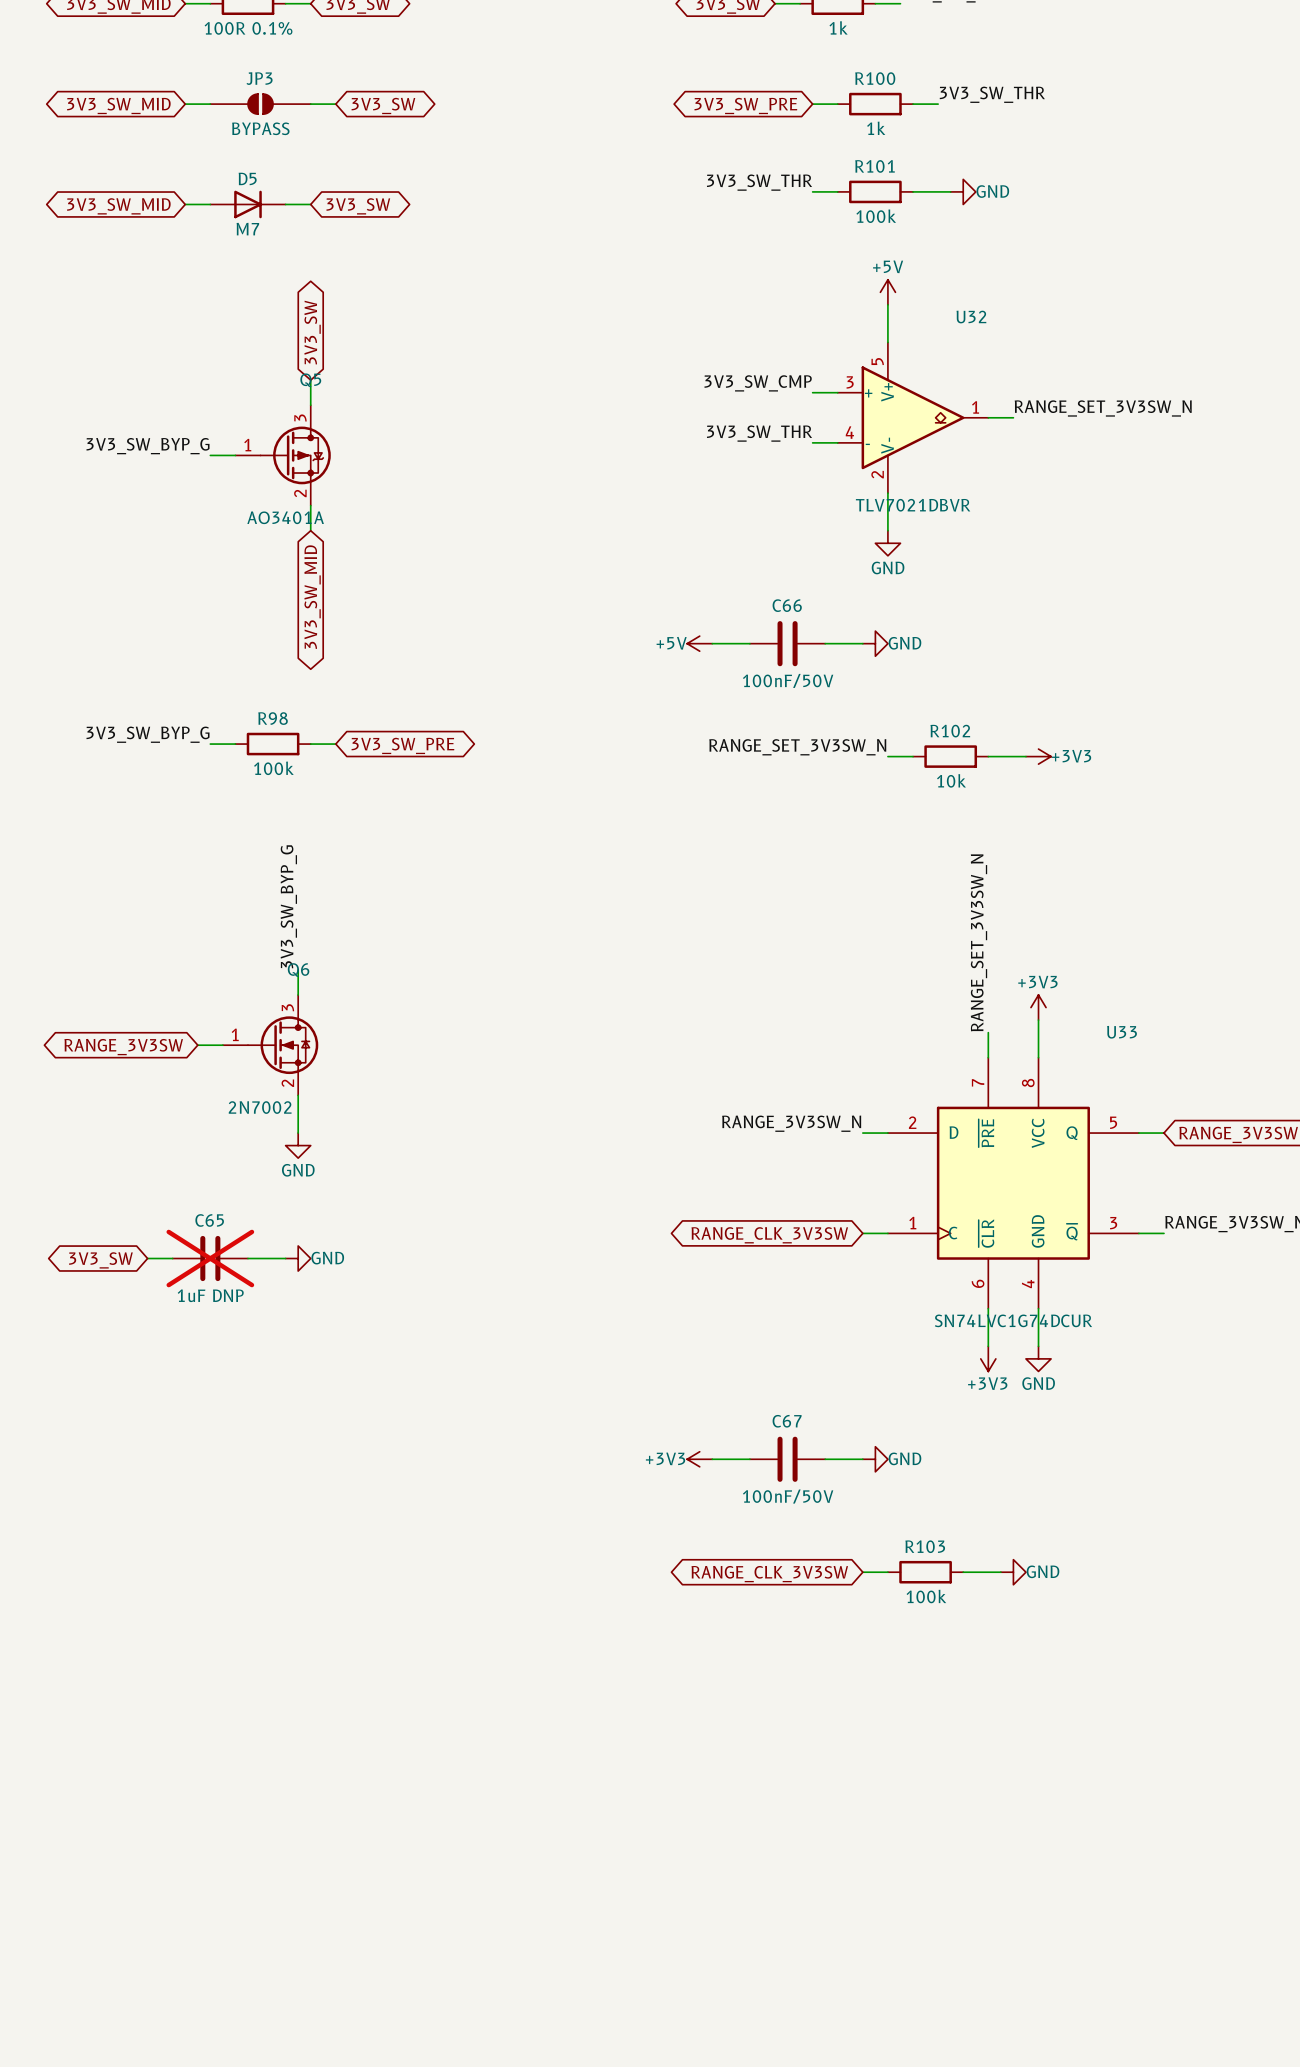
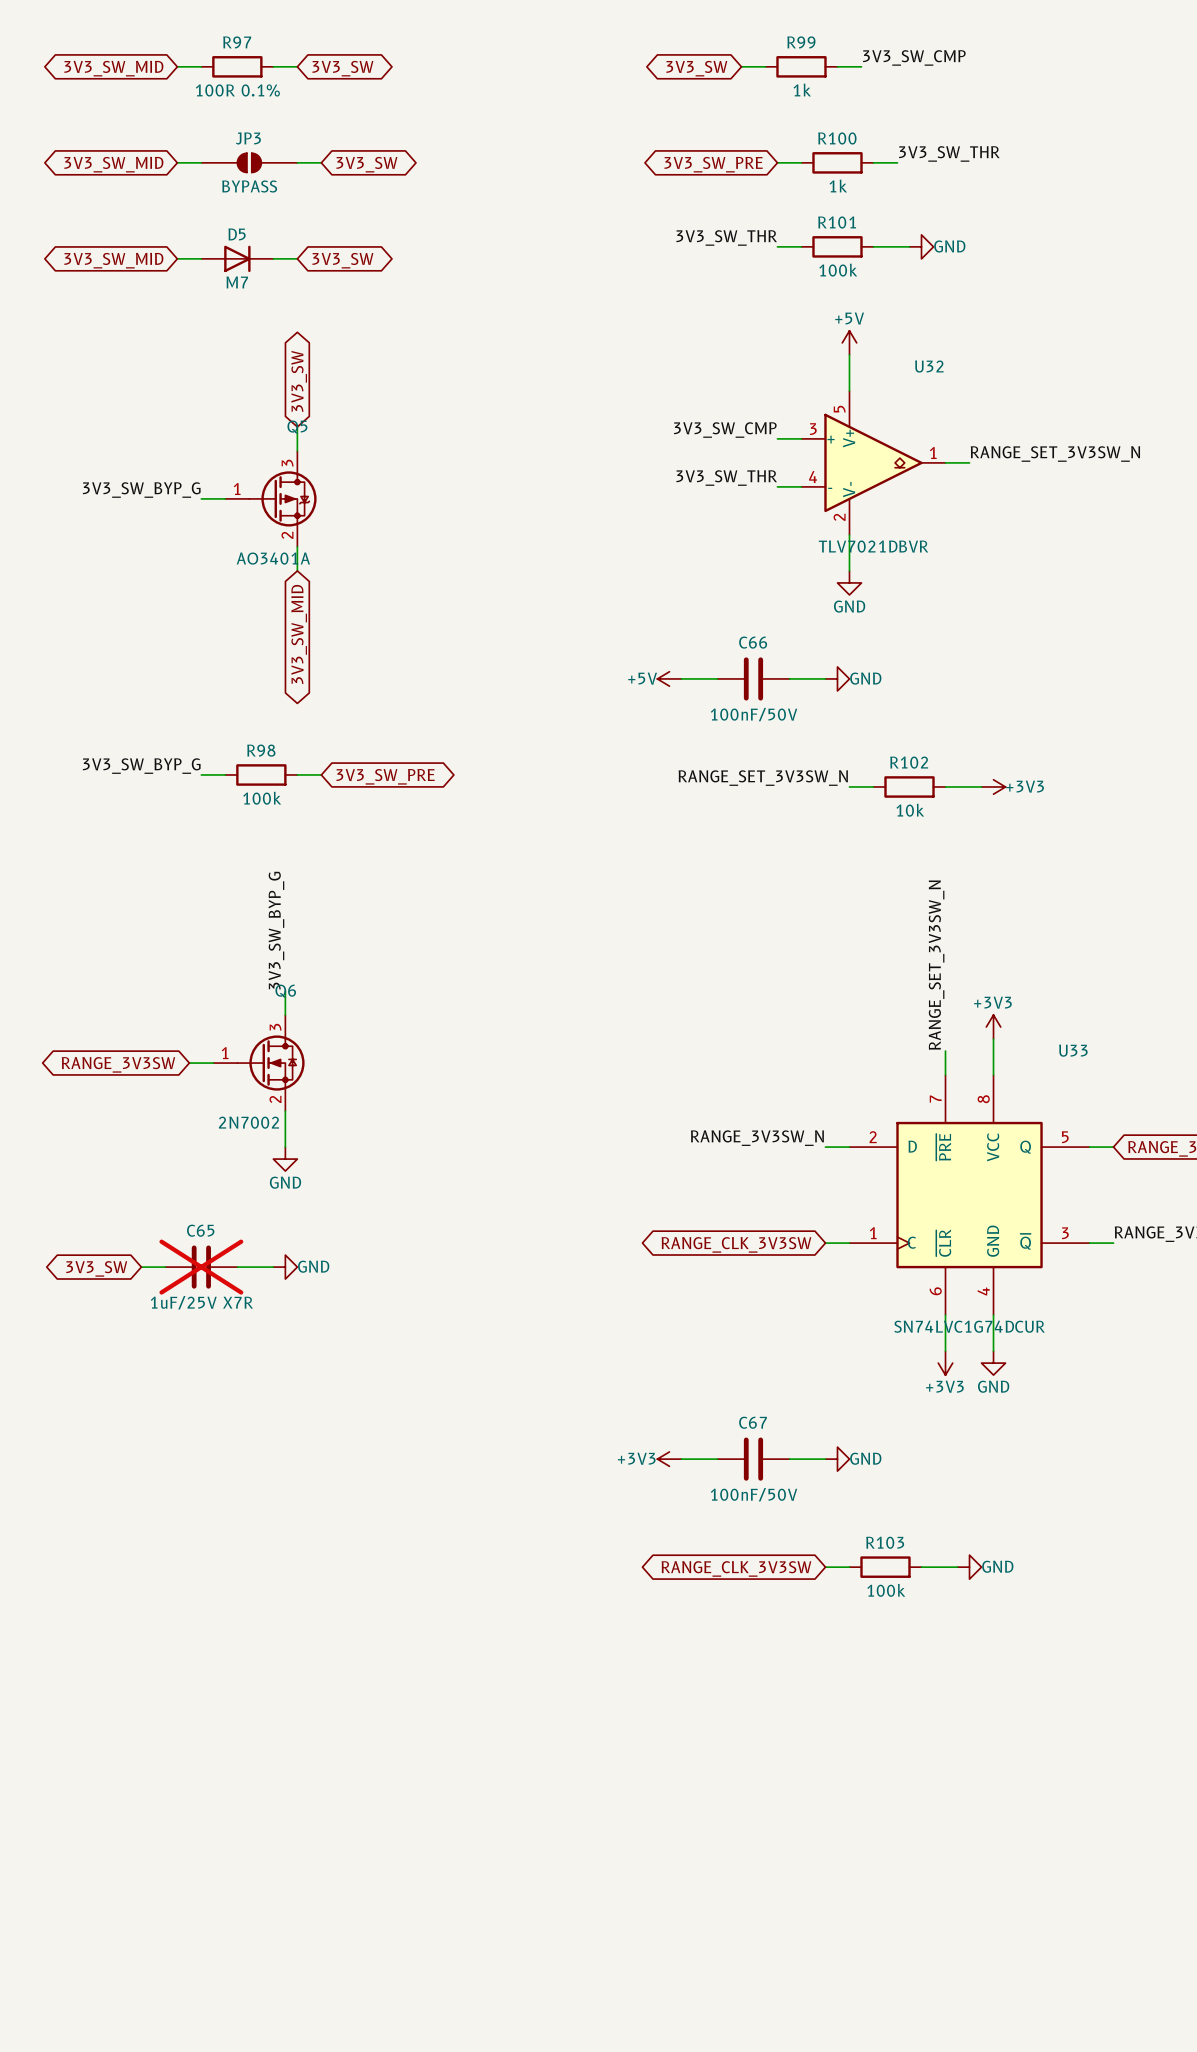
C65 value: 1uF DNP (210, 1295) -> 1uF/25V X7R (201, 1302)

